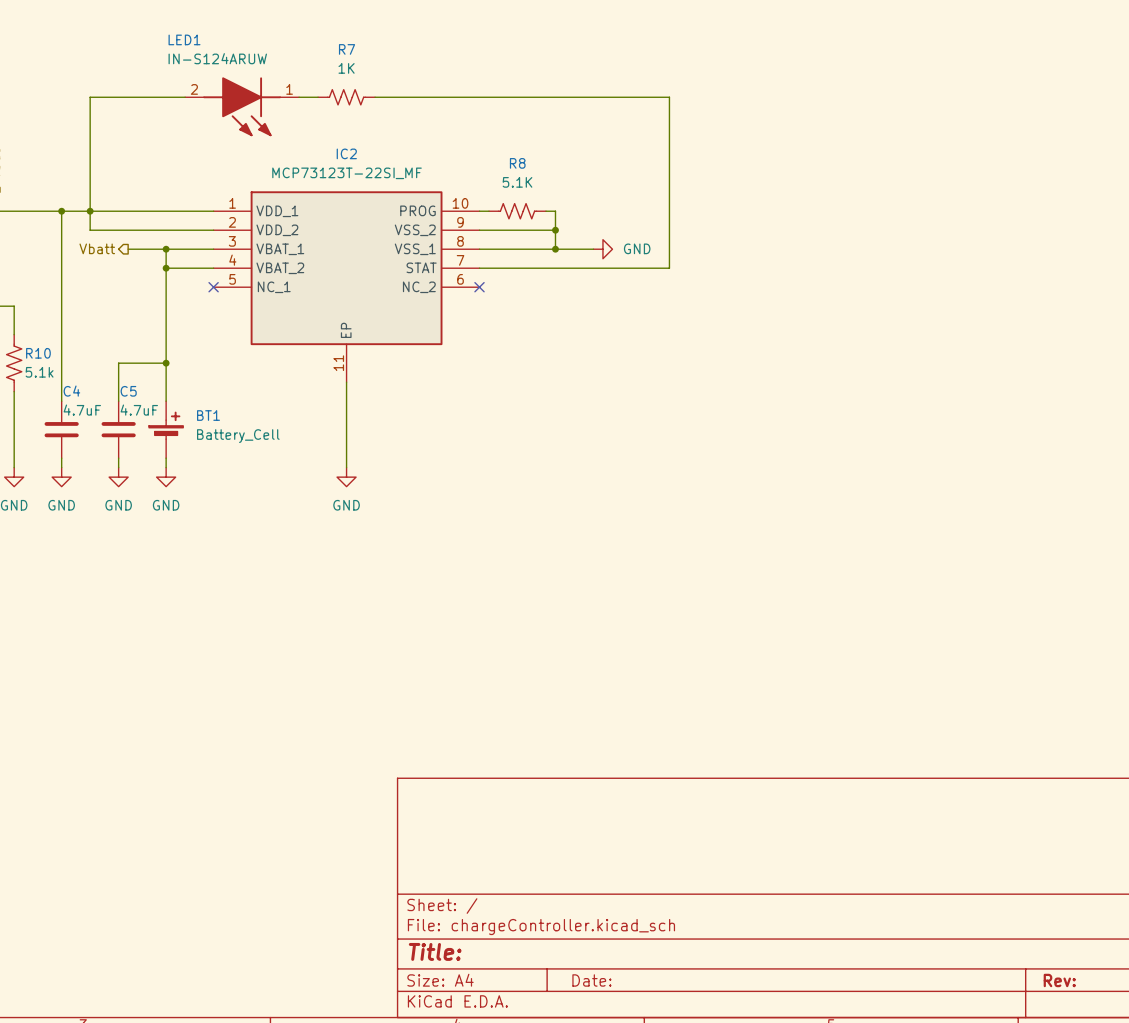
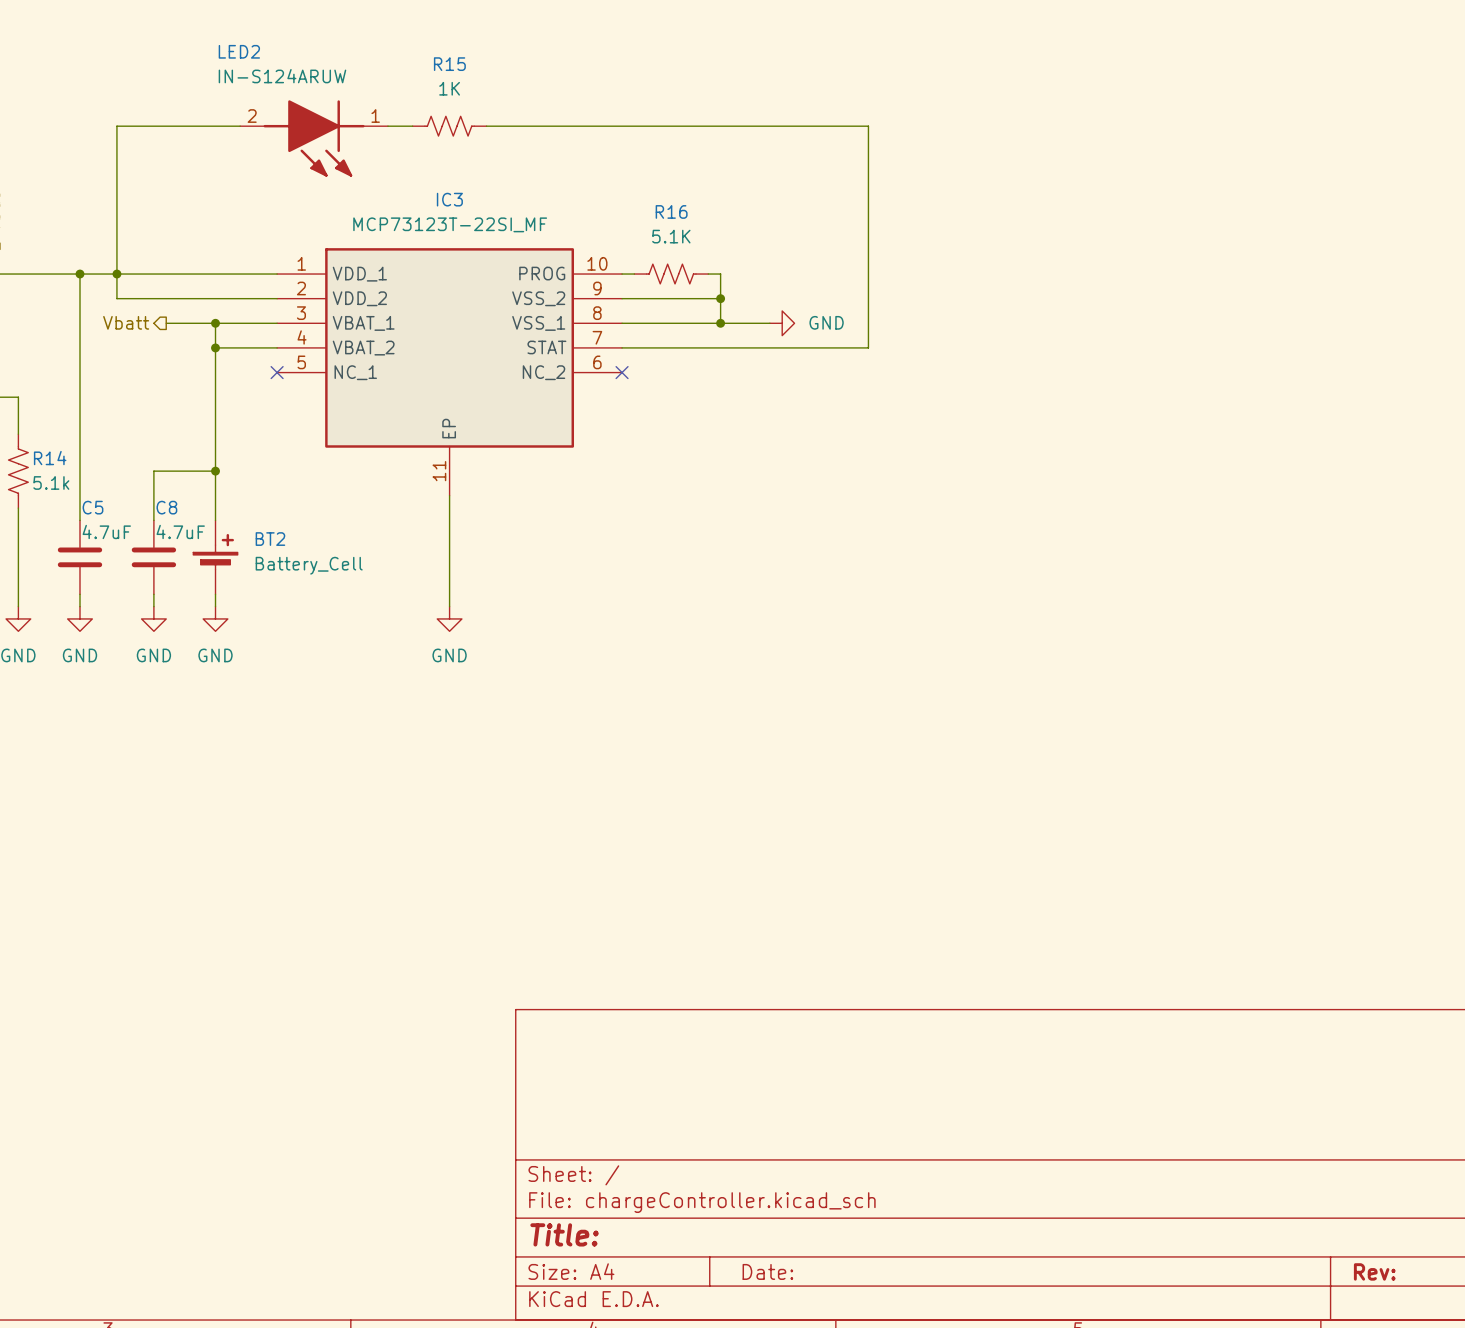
LED1 name: LED1 (184, 39) -> LED2 (239, 51)
R7 name: R7 (347, 49) -> R15 (449, 64)
IC2 name: IC2 (346, 153) -> IC3 (449, 199)
R8 name: R8 (517, 163) -> R16 (671, 211)
R10 name: R10 (38, 353) -> R14 (50, 458)
C4 name: C4 (71, 391) -> C5 (92, 507)
C5 name: C5 (128, 391) -> C8 (166, 507)
BT1 name: BT1 (208, 415) -> BT2 (270, 539)

